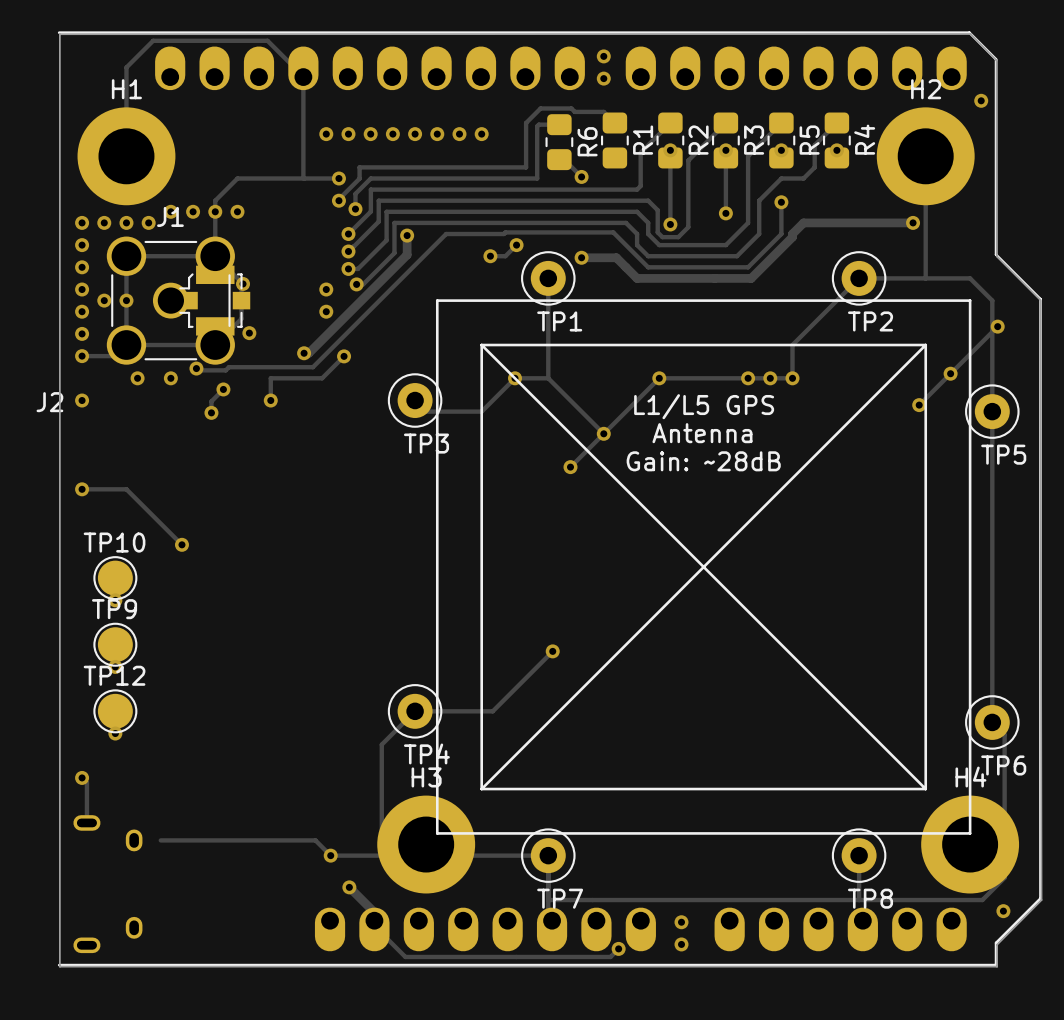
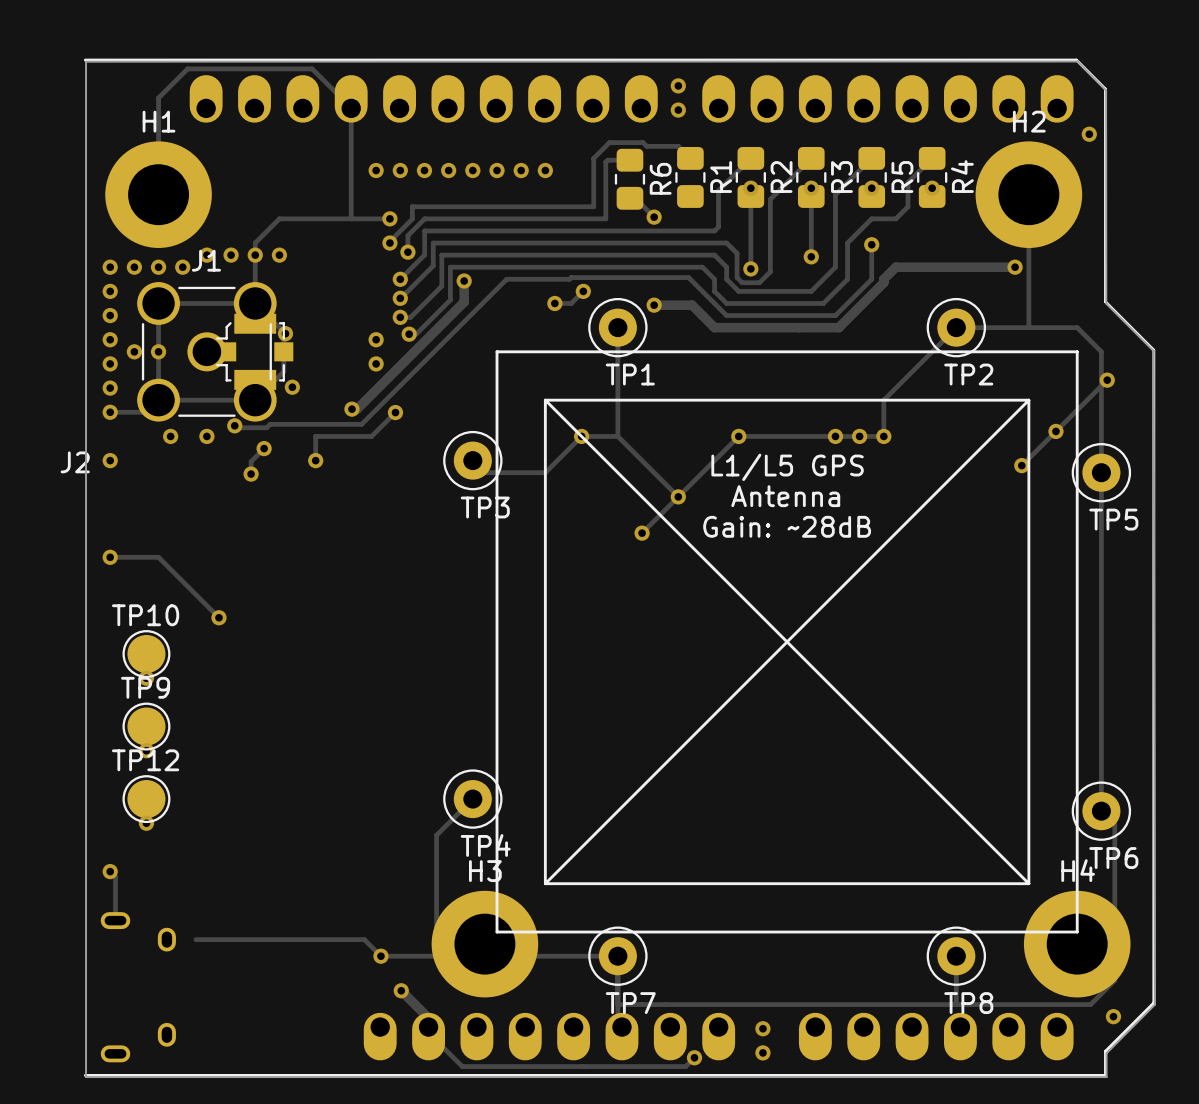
track: (552, 651) (492, 711) (415, 711) -> none
via: (552, 651) -> none

